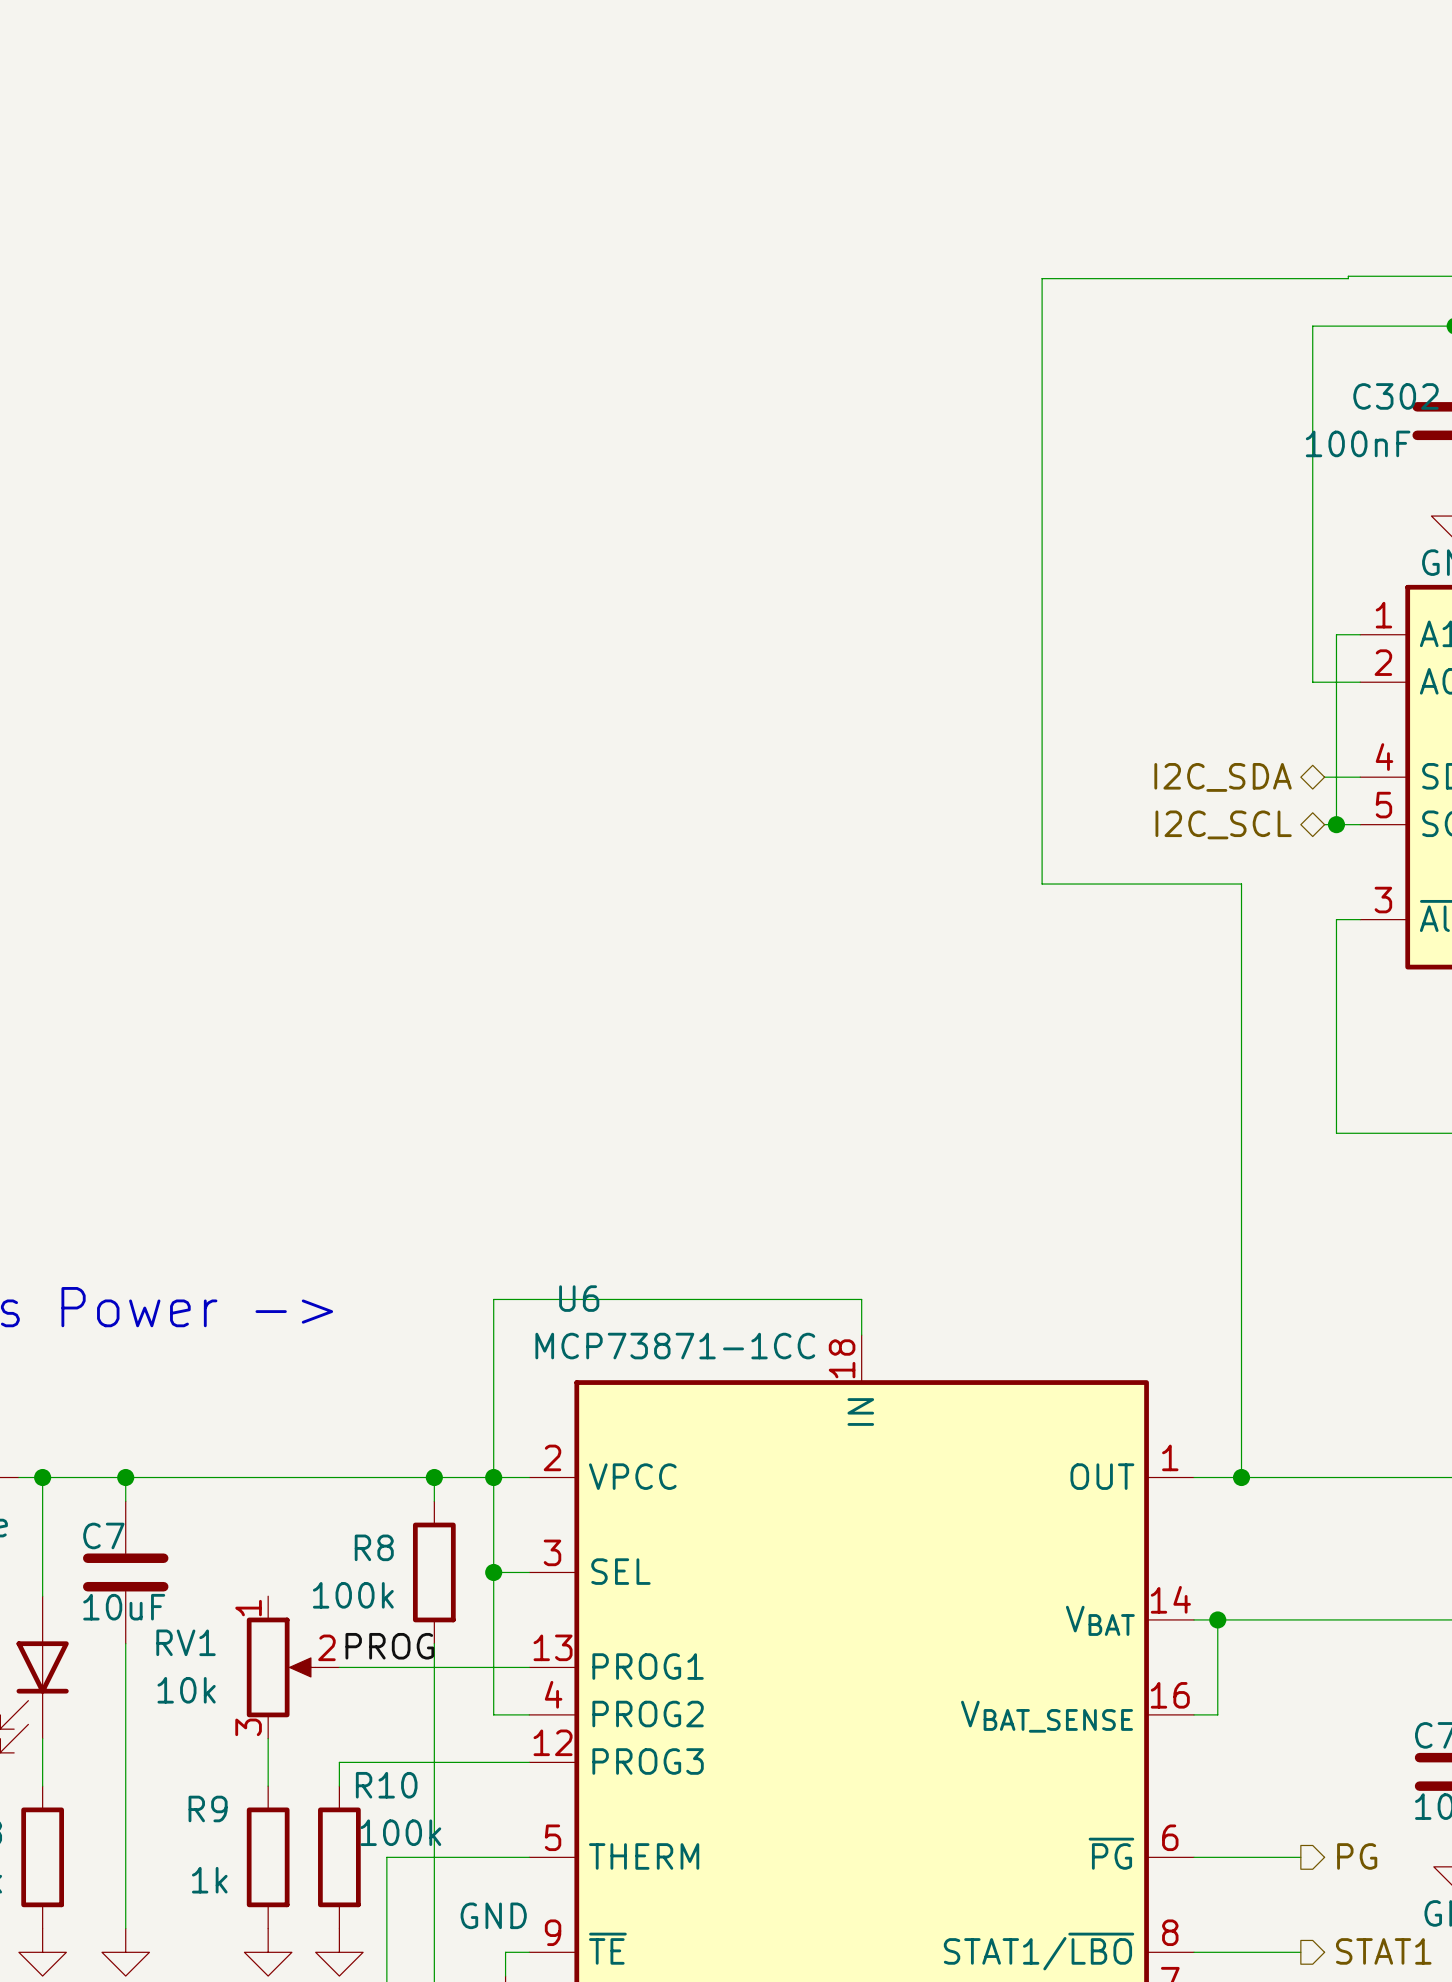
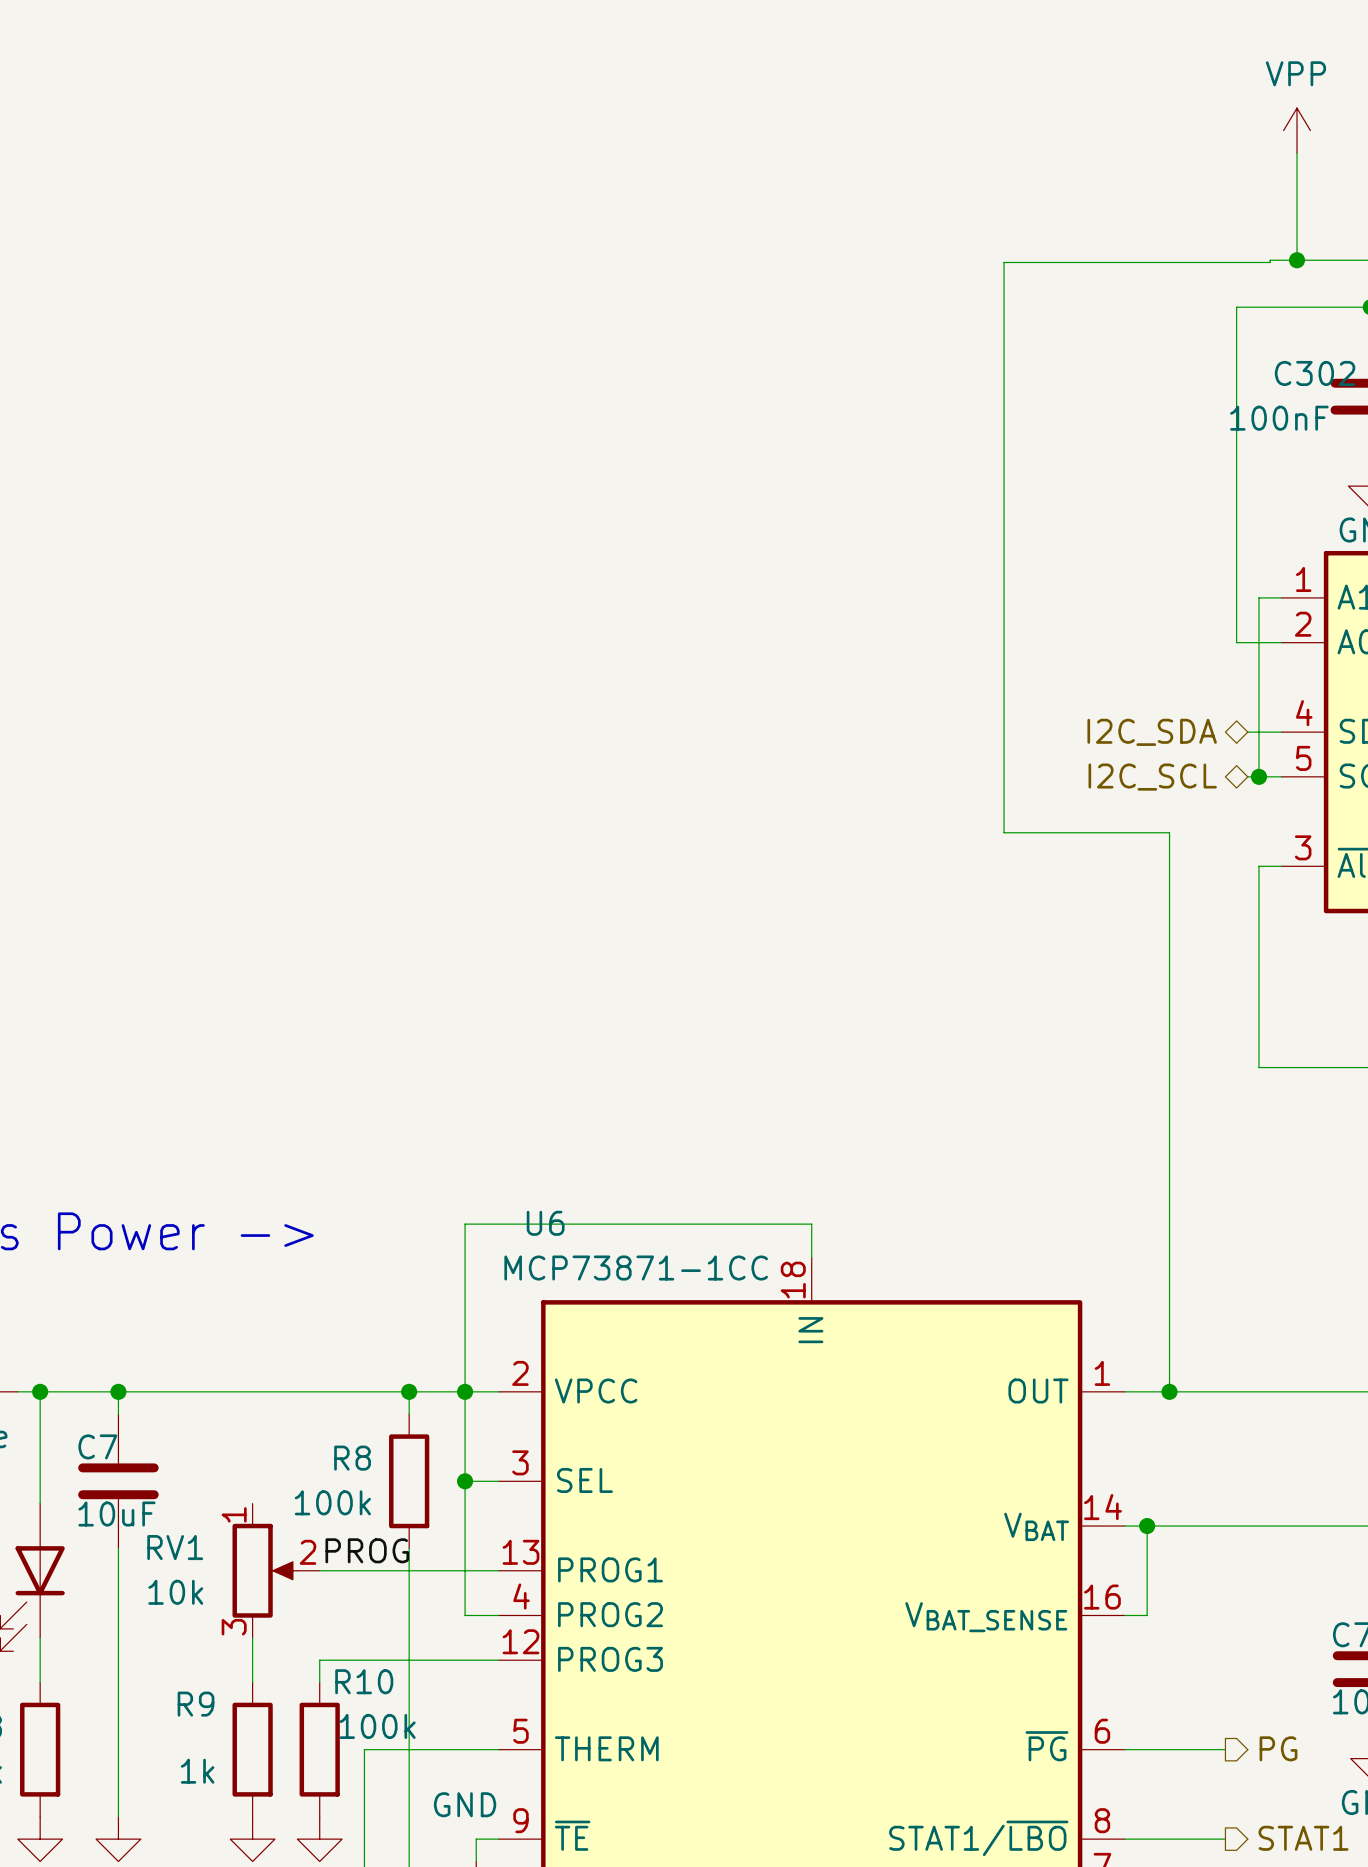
power symbol: none -> VPP (1297, 130)
wire: none -> (1297, 152) (1297, 260)
junction: none -> (1297, 260)
wire: (1065, 278) (1042, 278) (1042, 884) (1065, 884) -> (1004, 262) (1004, 832)

